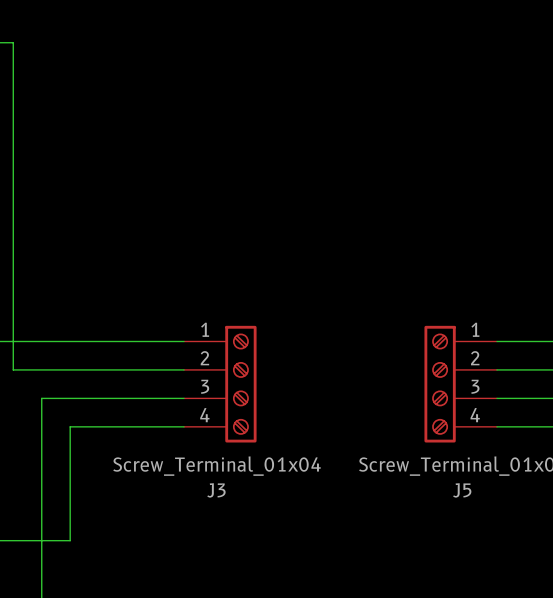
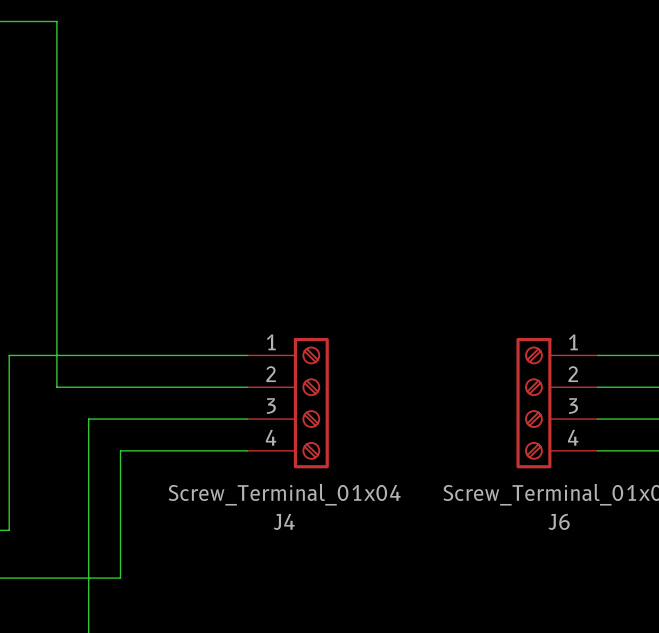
J3 name: J3 (216, 490) -> J4 (284, 521)
J5 name: J5 (462, 490) -> J6 (559, 521)

